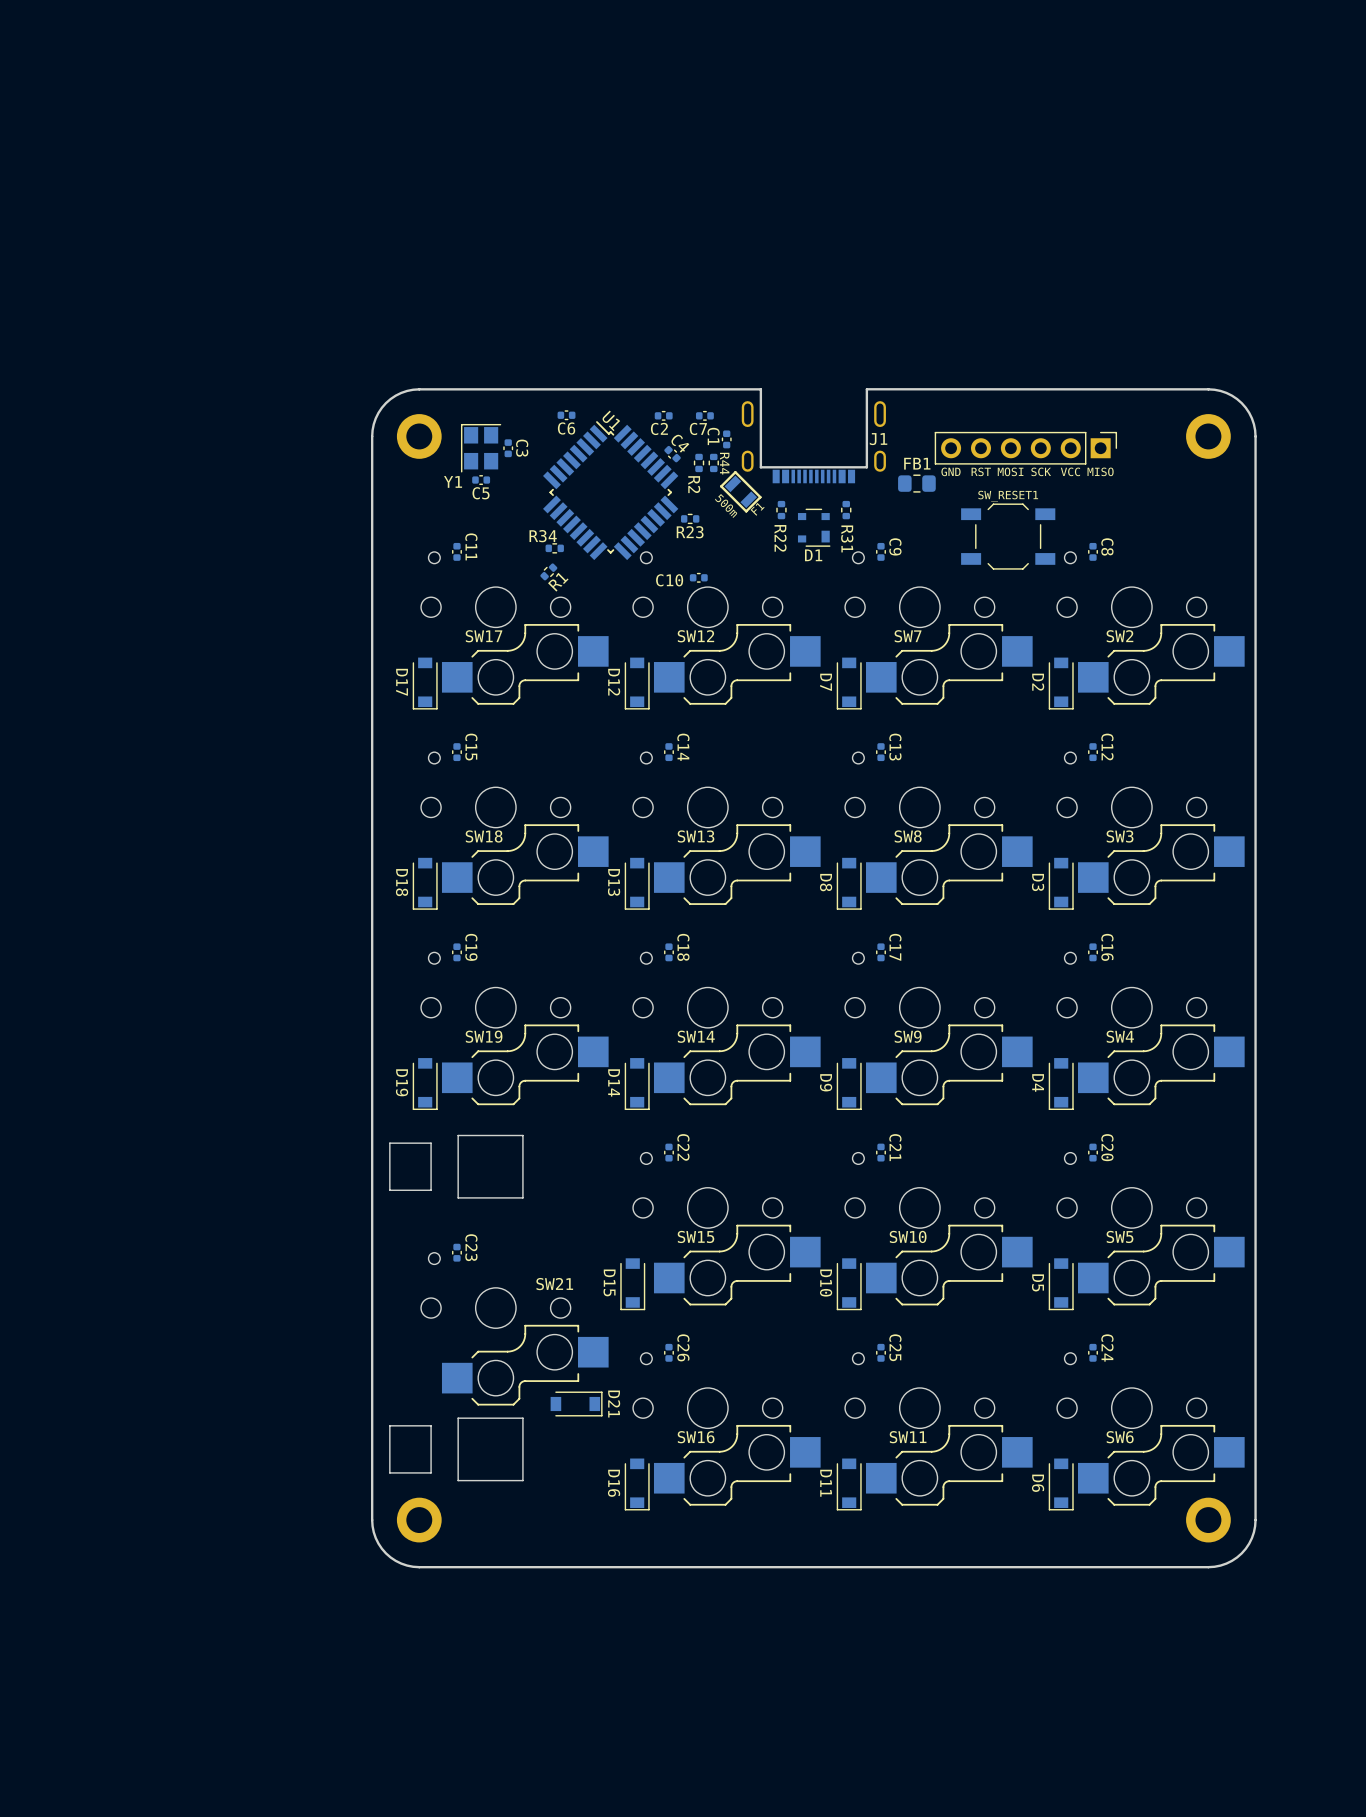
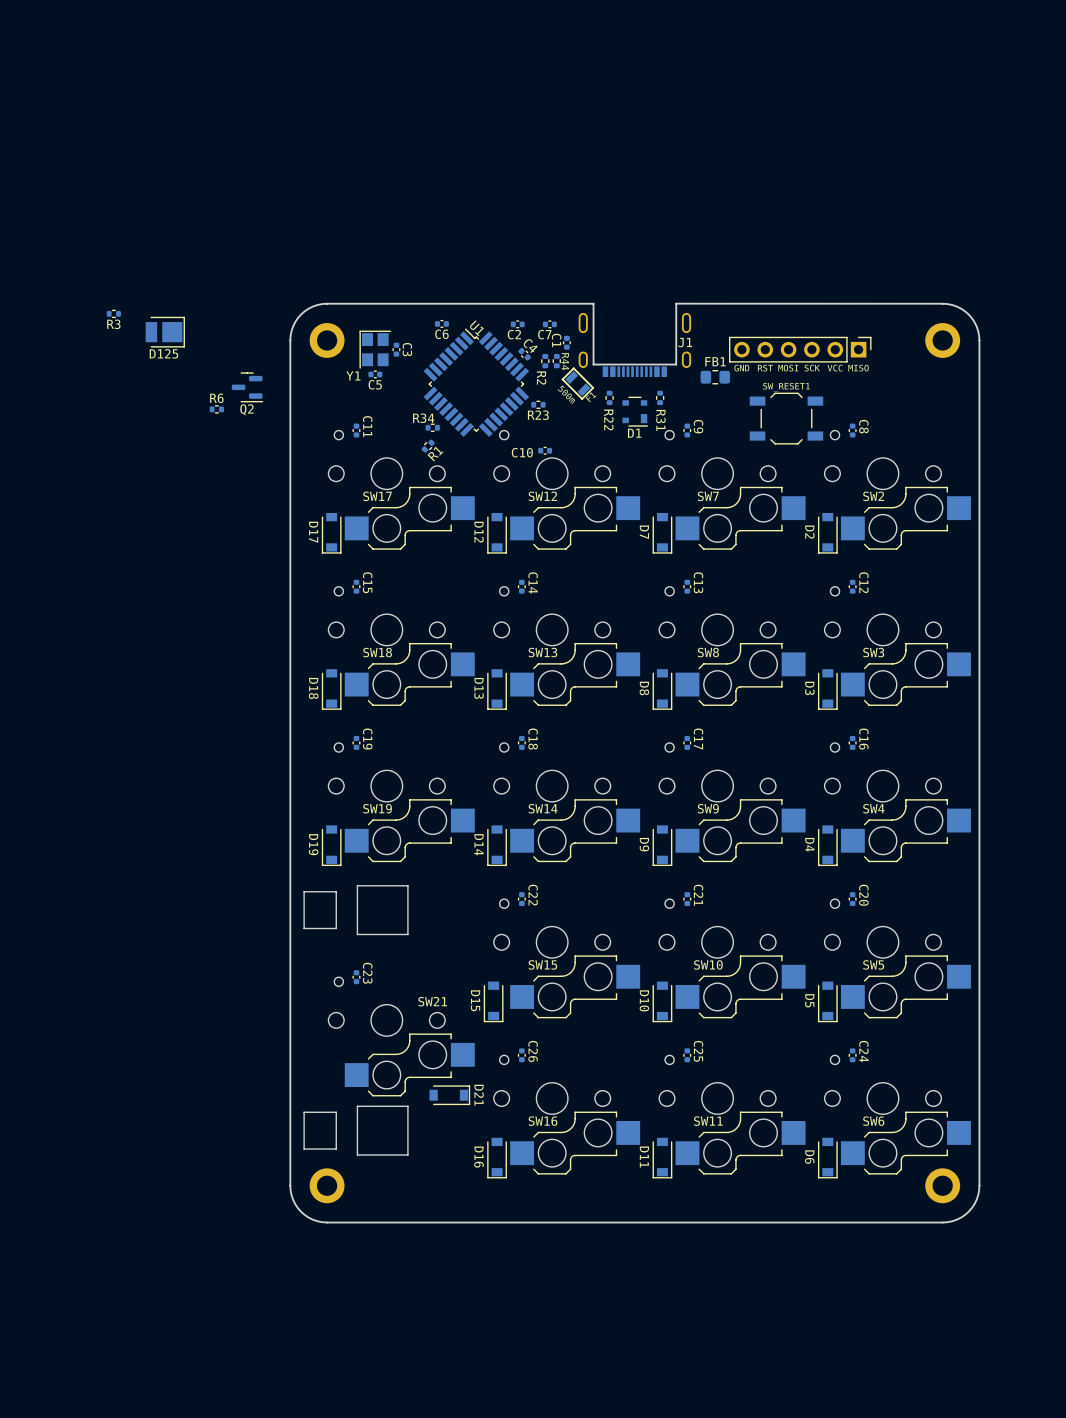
R3: none -> (113, 313)
D125: none -> (165, 332)
Q2: none -> (247, 387)
R6: none -> (216, 409)

